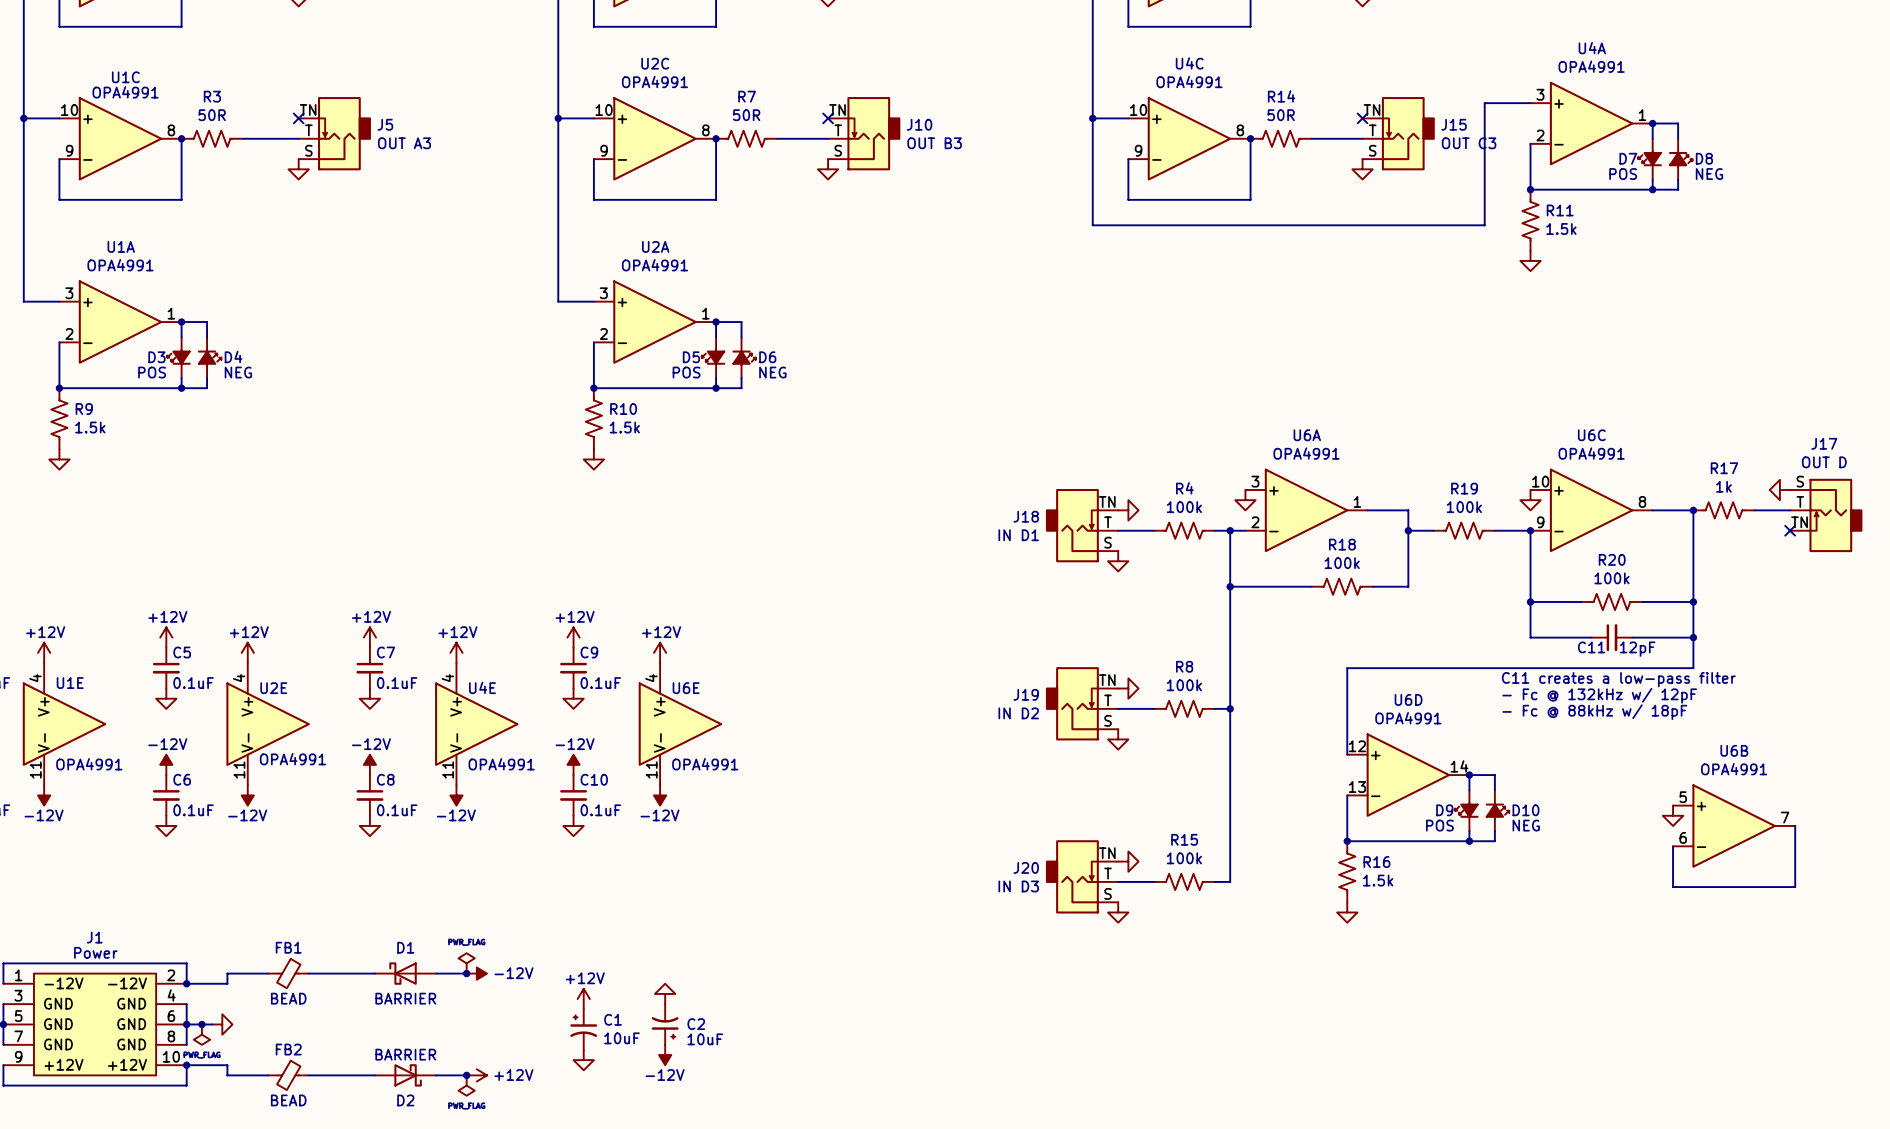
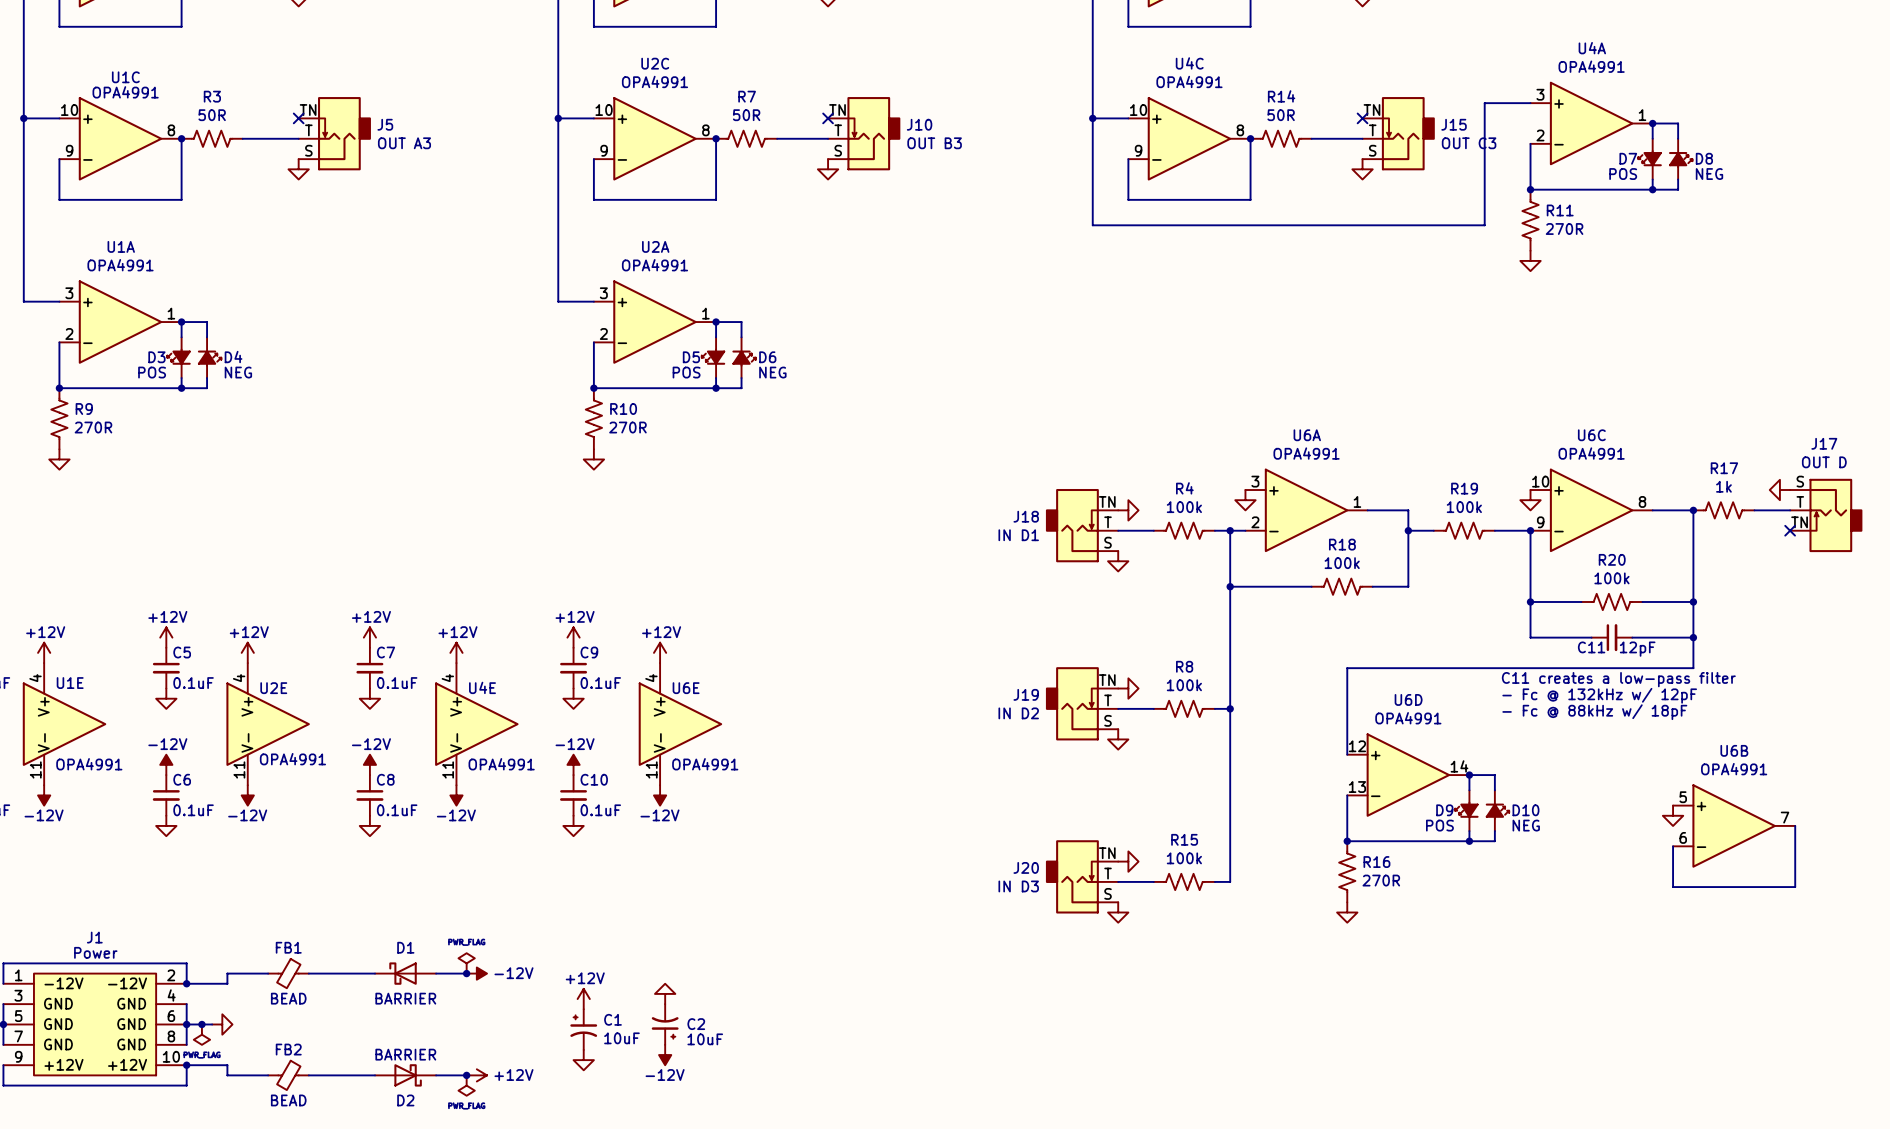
R11 value: 1.5k (1561, 229) -> 270R (1564, 229)
R9 value: 1.5k (90, 427) -> 270R (93, 427)
R10 value: 1.5k (624, 427) -> 270R (627, 427)
R16 value: 1.5k (1378, 880) -> 270R (1381, 880)

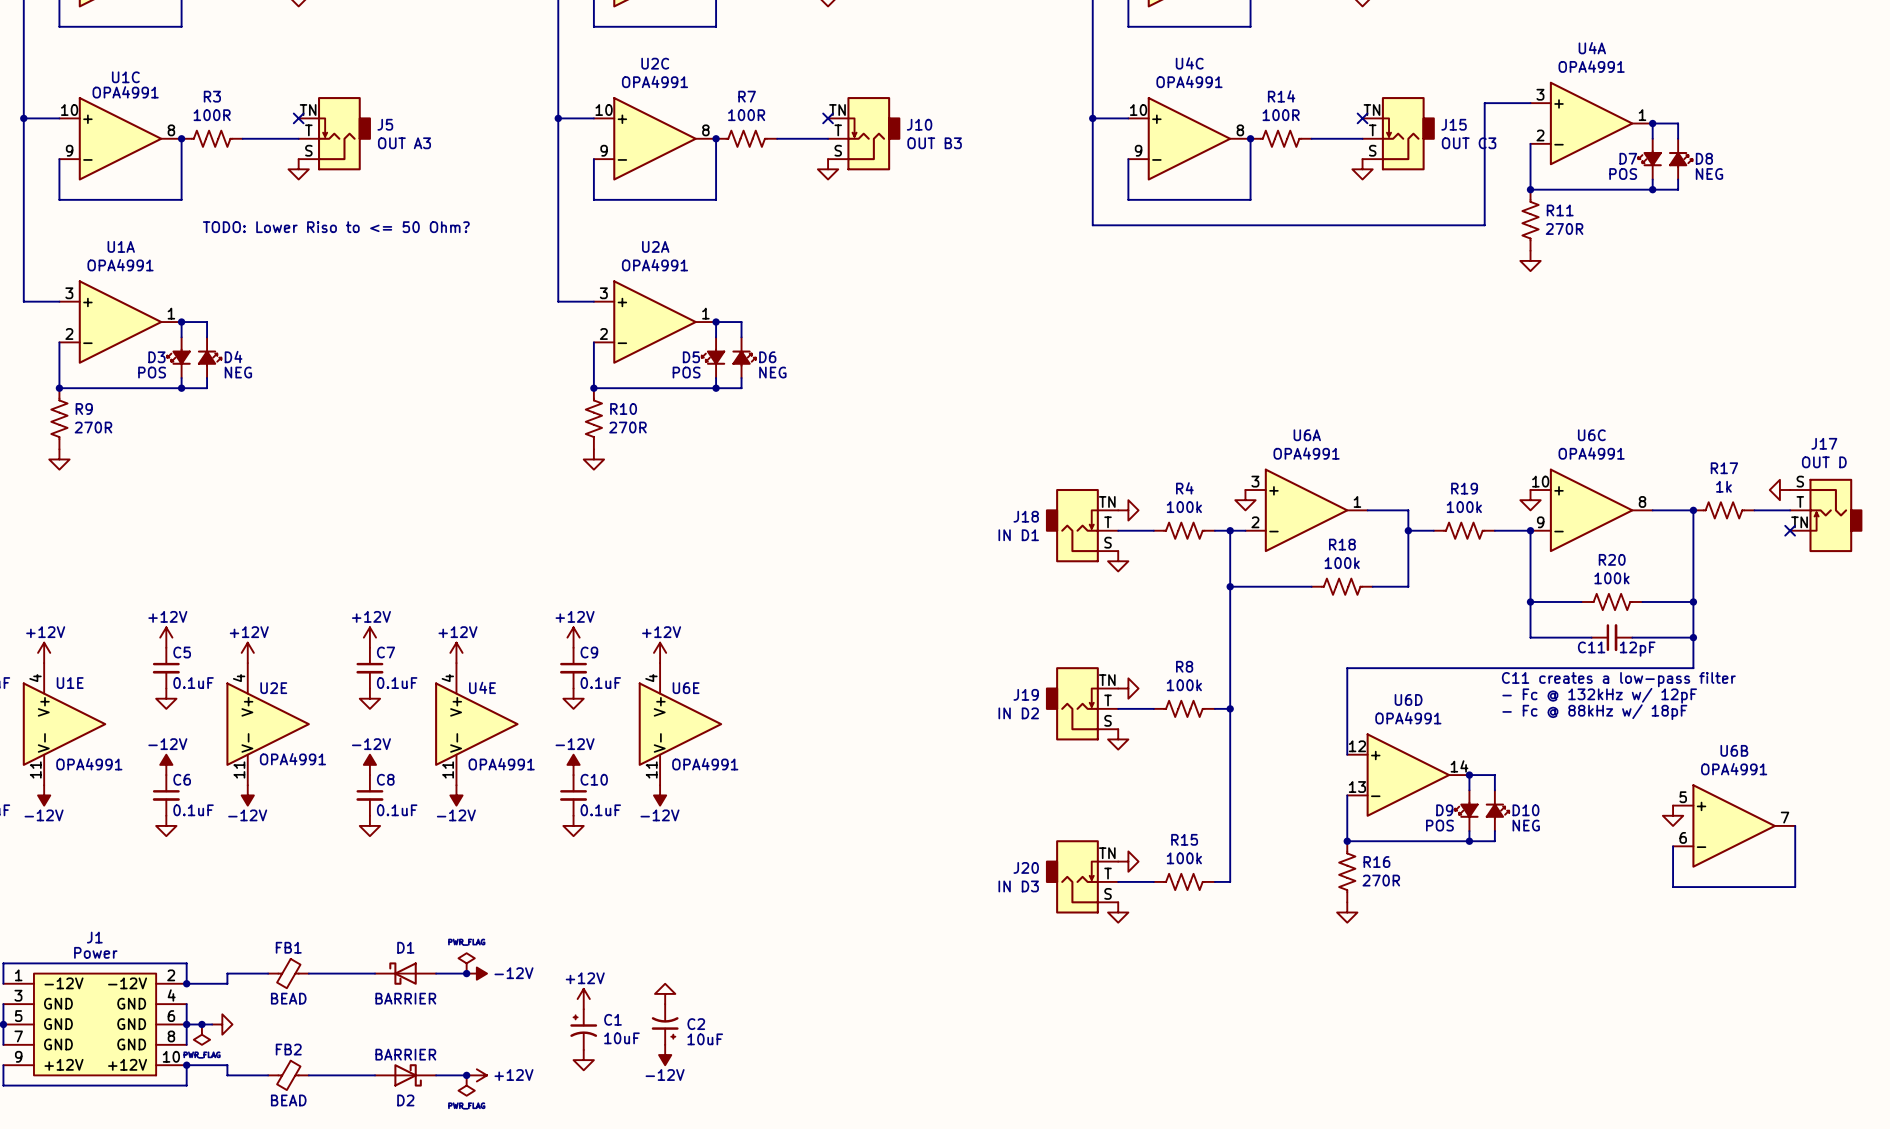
R3 value: 50R (212, 115) -> 100R (212, 115)
R7 value: 50R (746, 115) -> 100R (746, 115)
R14 value: 50R (1281, 115) -> 100R (1281, 115)
text: none -> TODO: Lower Riso to <= 50 Ohm? (336, 227)

